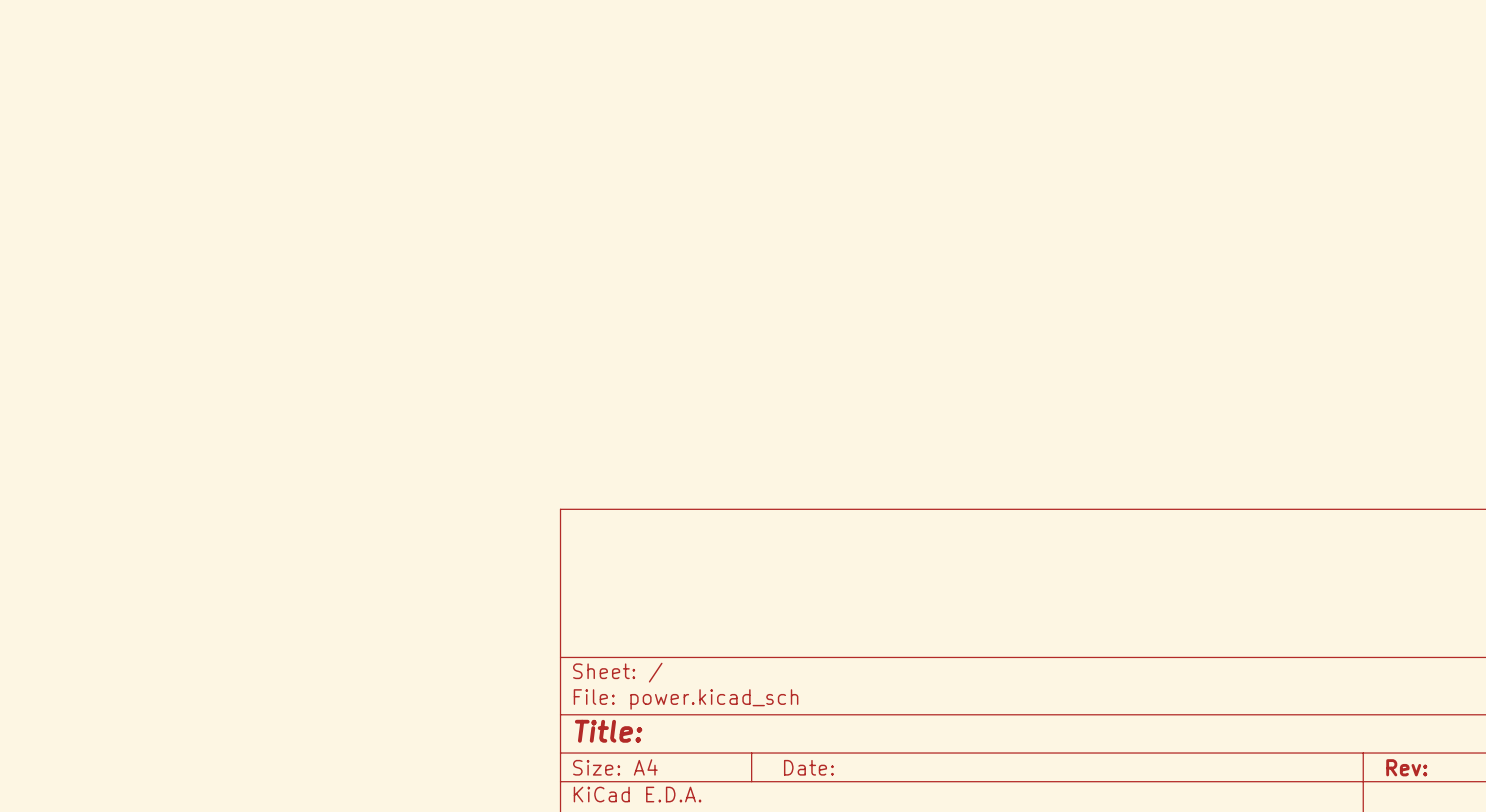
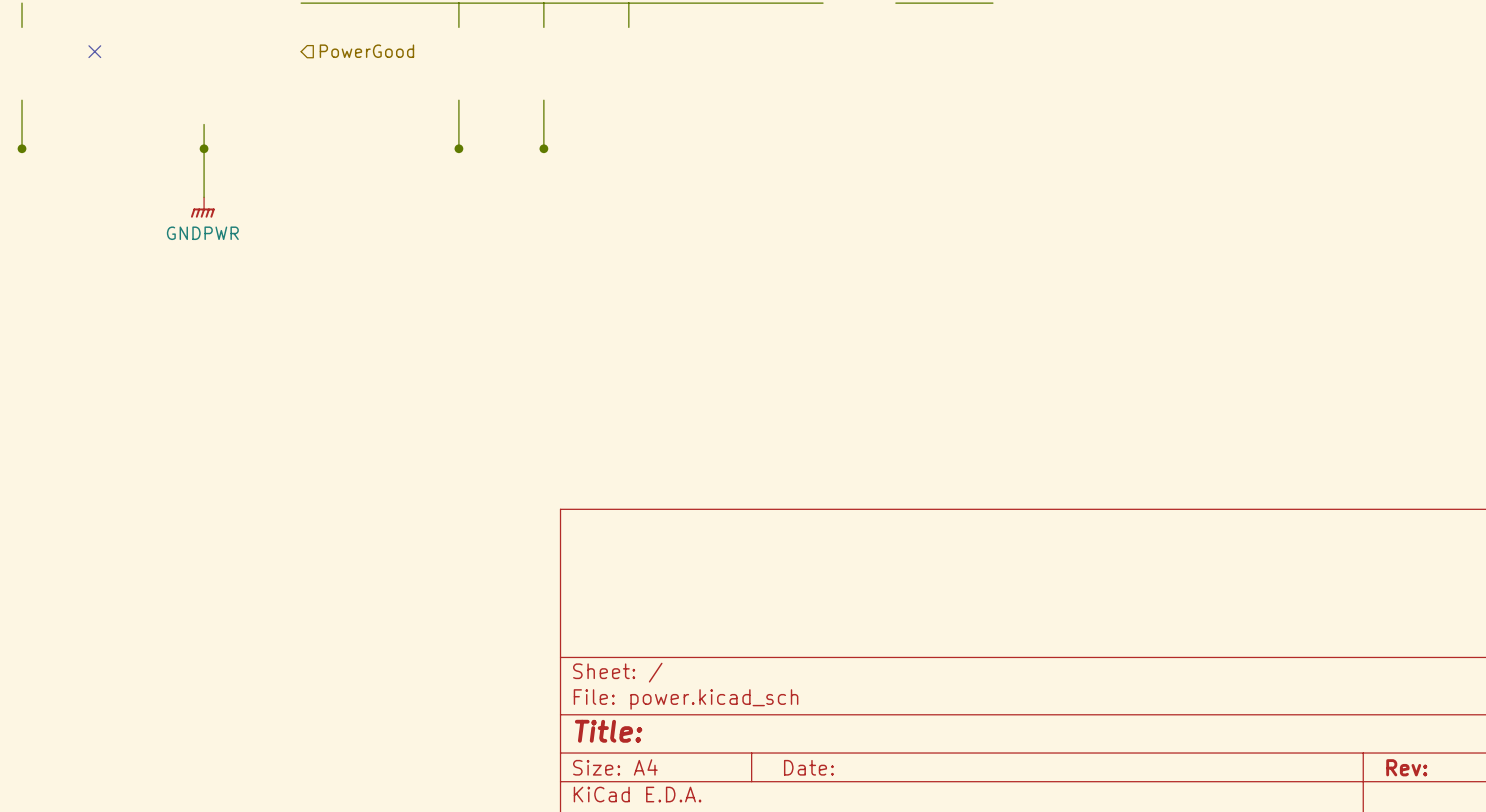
wire: none -> (22, 3) (22, 27)
wire: none -> (301, 3) (823, 3)
wire: none -> (458, 3) (458, 27)
wire: none -> (543, 3) (543, 27)
wire: none -> (628, 3) (628, 27)
wire: none -> (895, 3) (992, 3)
no-connect mark: none -> (94, 51)
hierarchical label: none -> PowerGood (366, 51)
wire: none -> (22, 100) (22, 148)
wire: none -> (458, 100) (458, 148)
wire: none -> (543, 100) (543, 148)
wire: none -> (204, 124) (204, 197)
junction: none -> (22, 148)
junction: none -> (204, 148)
junction: none -> (458, 148)
junction: none -> (543, 148)
power symbol: none -> GNDPWR (202, 207)

